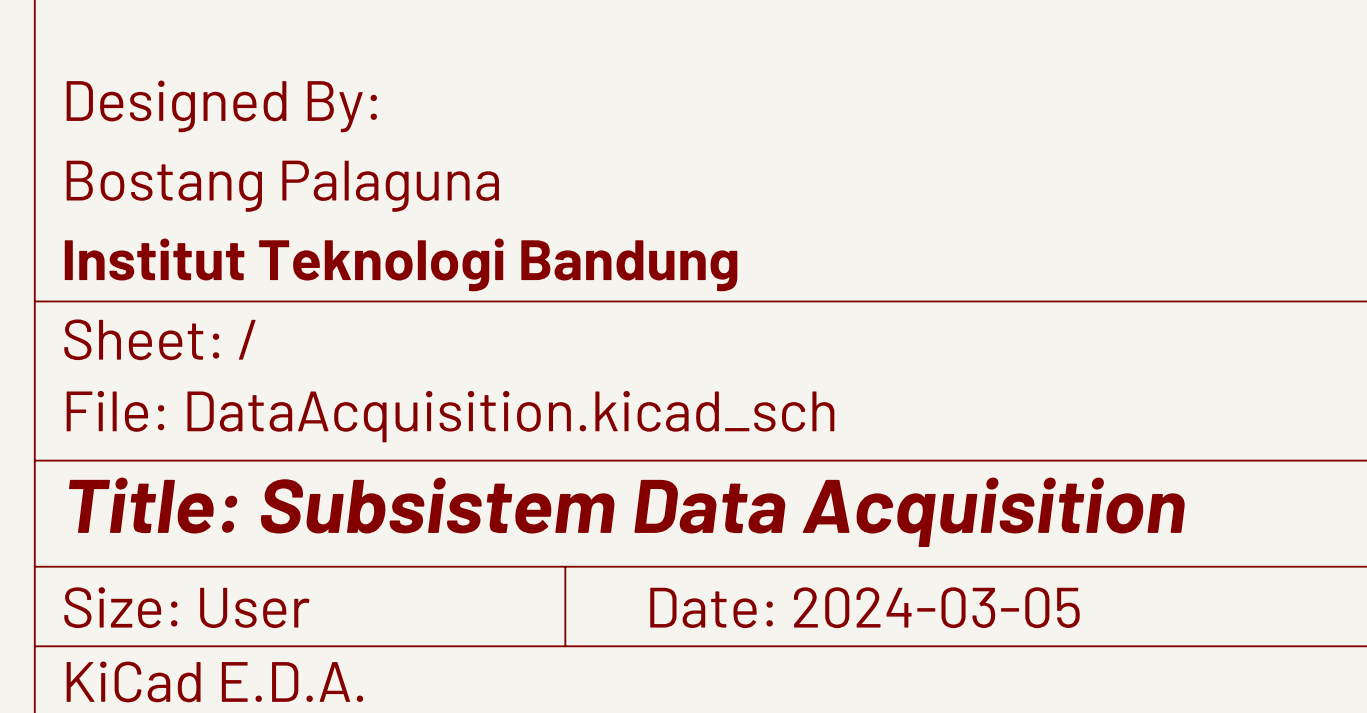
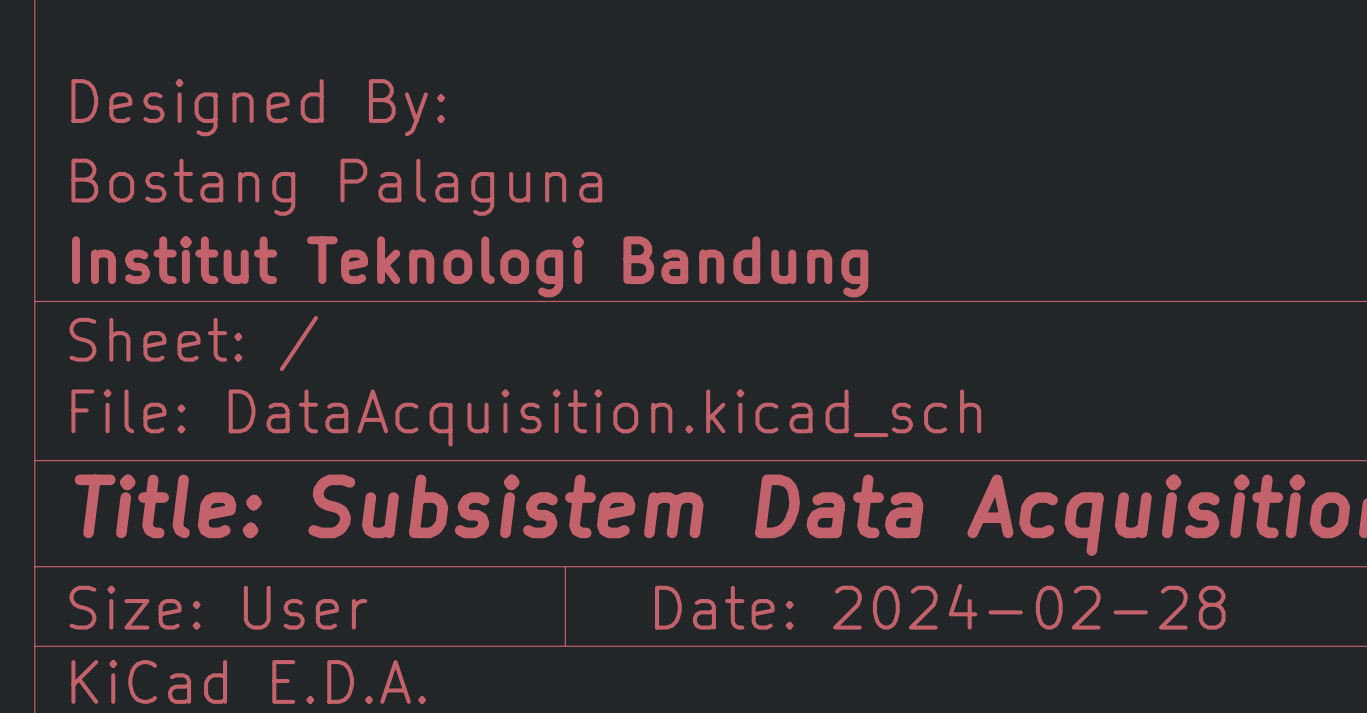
title block: Date: 2024-03-05 (865, 607) -> Date: 2024-02-28 (940, 606)

